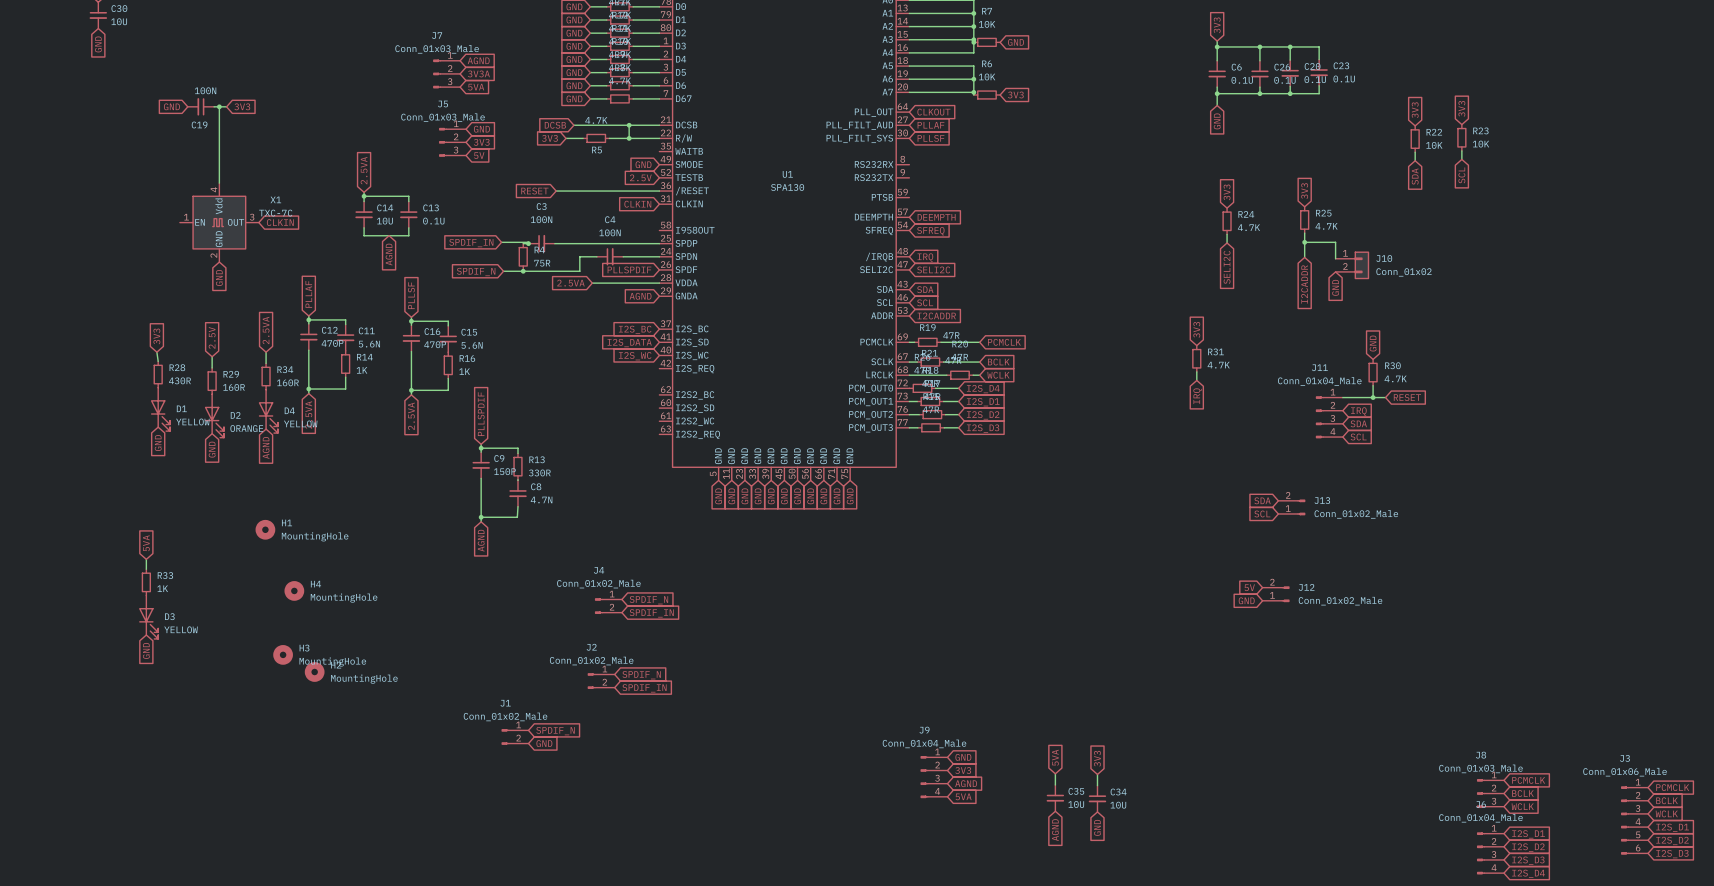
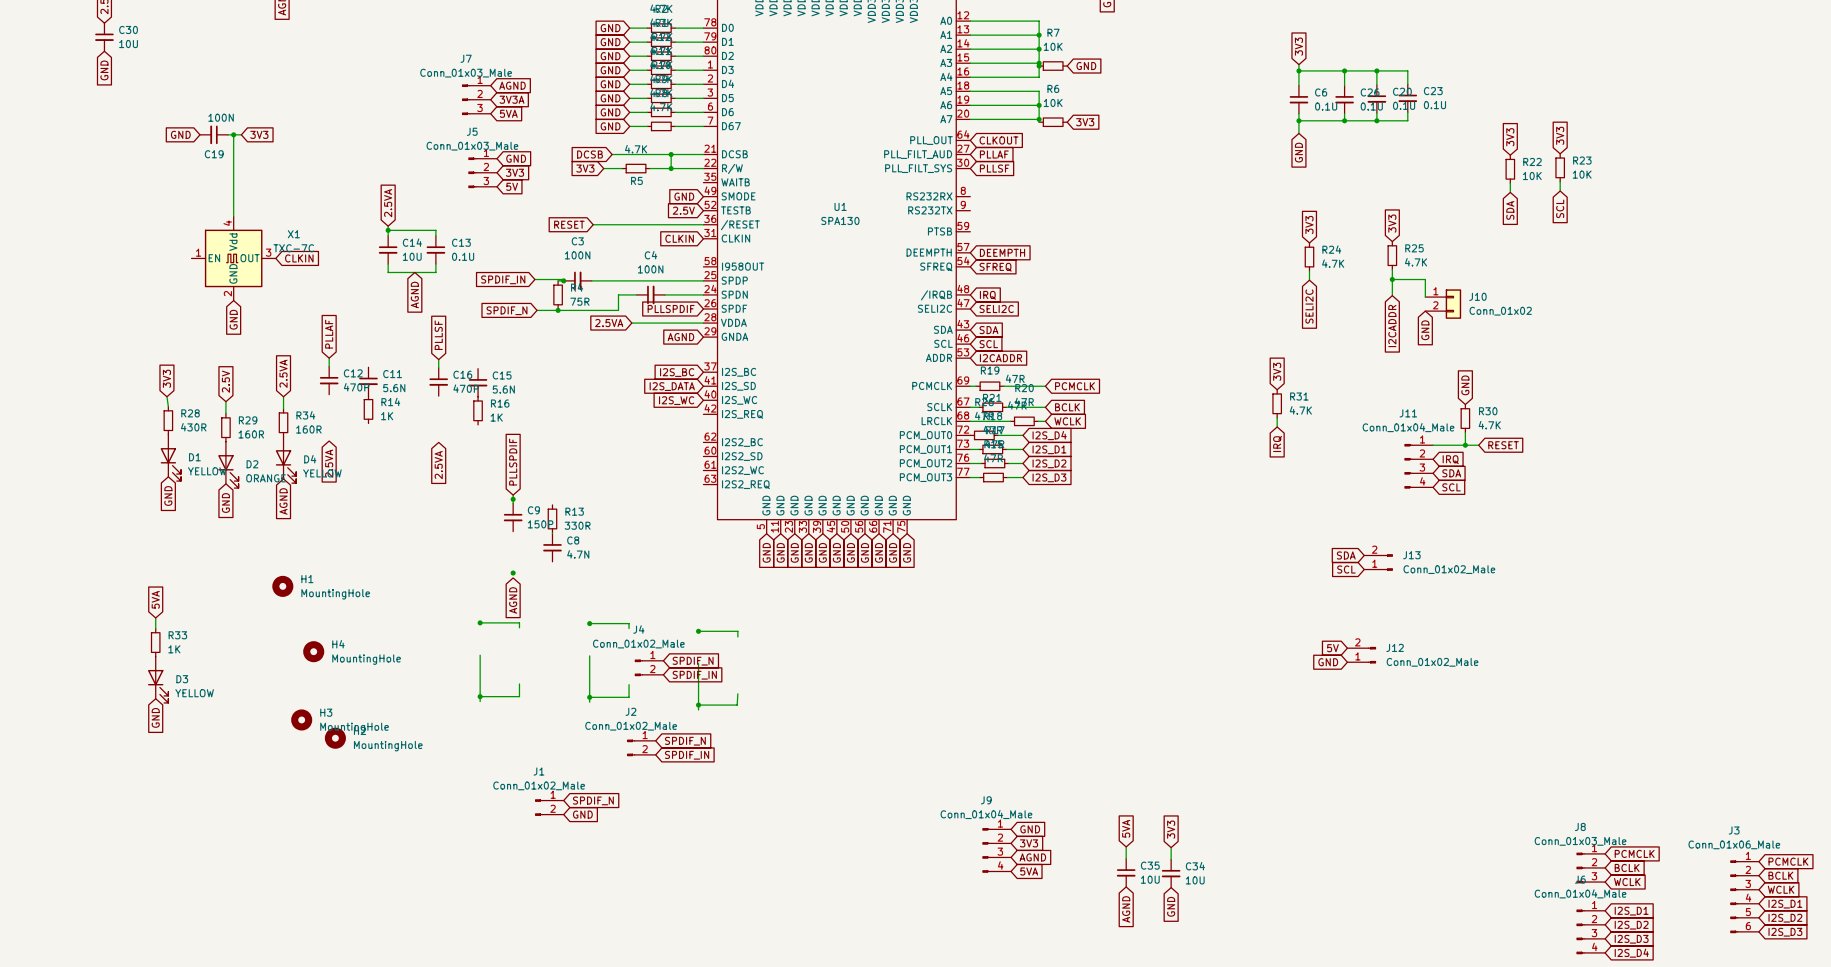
wire: (308, 319) (345, 319) (345, 324) -> none
junction: (308, 319) -> none
wire: (411, 321) (448, 321) (448, 325) -> none
junction: (411, 321) -> none
wire: (308, 350) (308, 393) -> none
wire: (411, 351) (411, 394) -> none
wire: (345, 377) (345, 389) (308, 389) -> none
wire: (448, 378) (448, 390) (411, 390) -> none
junction: (308, 389) -> none
junction: (411, 390) -> none
wire: (481, 448) (517, 448) (517, 453) -> none
wire: (481, 478) (481, 521) -> (480, 655) (480, 701)
wire: (517, 506) (517, 517) (481, 517) -> none
wire: none -> (480, 622) (519, 622) (519, 627)
junction: none -> (480, 622)
wire: none -> (589, 623) (629, 623) (629, 628)
junction: none -> (589, 623)
wire: none -> (698, 631) (737, 631) (737, 636)
junction: none -> (698, 631)
wire: none -> (589, 655) (589, 702)
wire: none -> (698, 663) (698, 709)
wire: none -> (519, 683) (519, 696) (480, 696)
wire: none -> (629, 684) (629, 697) (589, 697)
wire: none -> (737, 693) (737, 705) (698, 705)
junction: none -> (480, 696)
junction: none -> (589, 697)
junction: none -> (698, 705)

